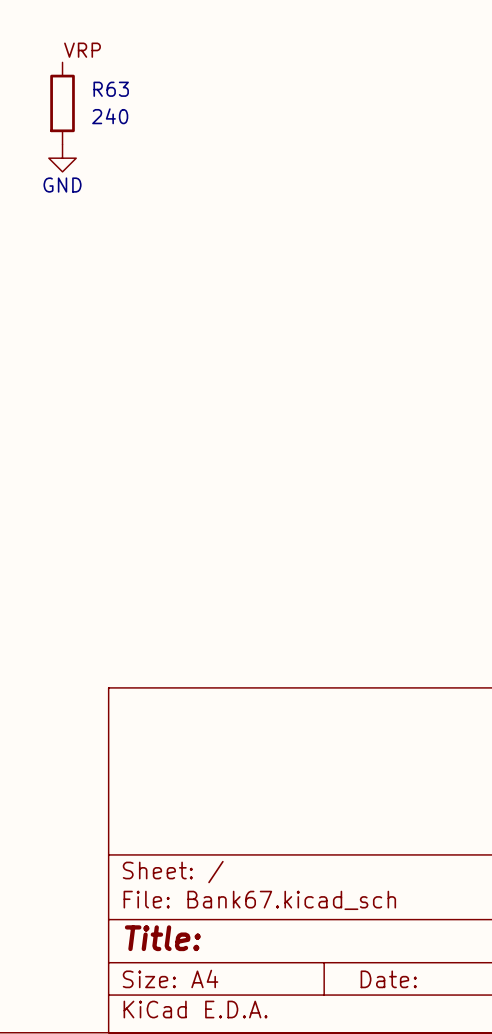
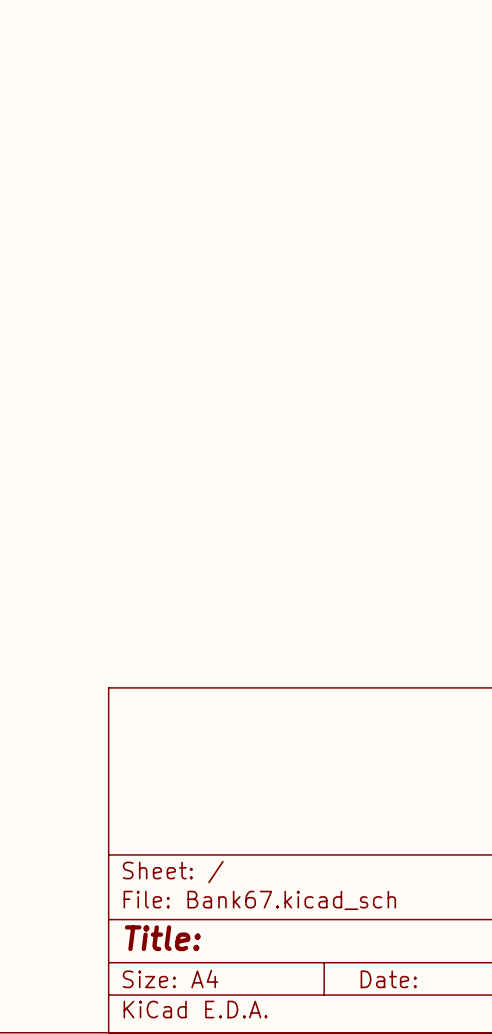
label: VRP (82, 50) -> none
R63: 240 (62, 103) -> none
power symbol: GND (62, 158) -> none

